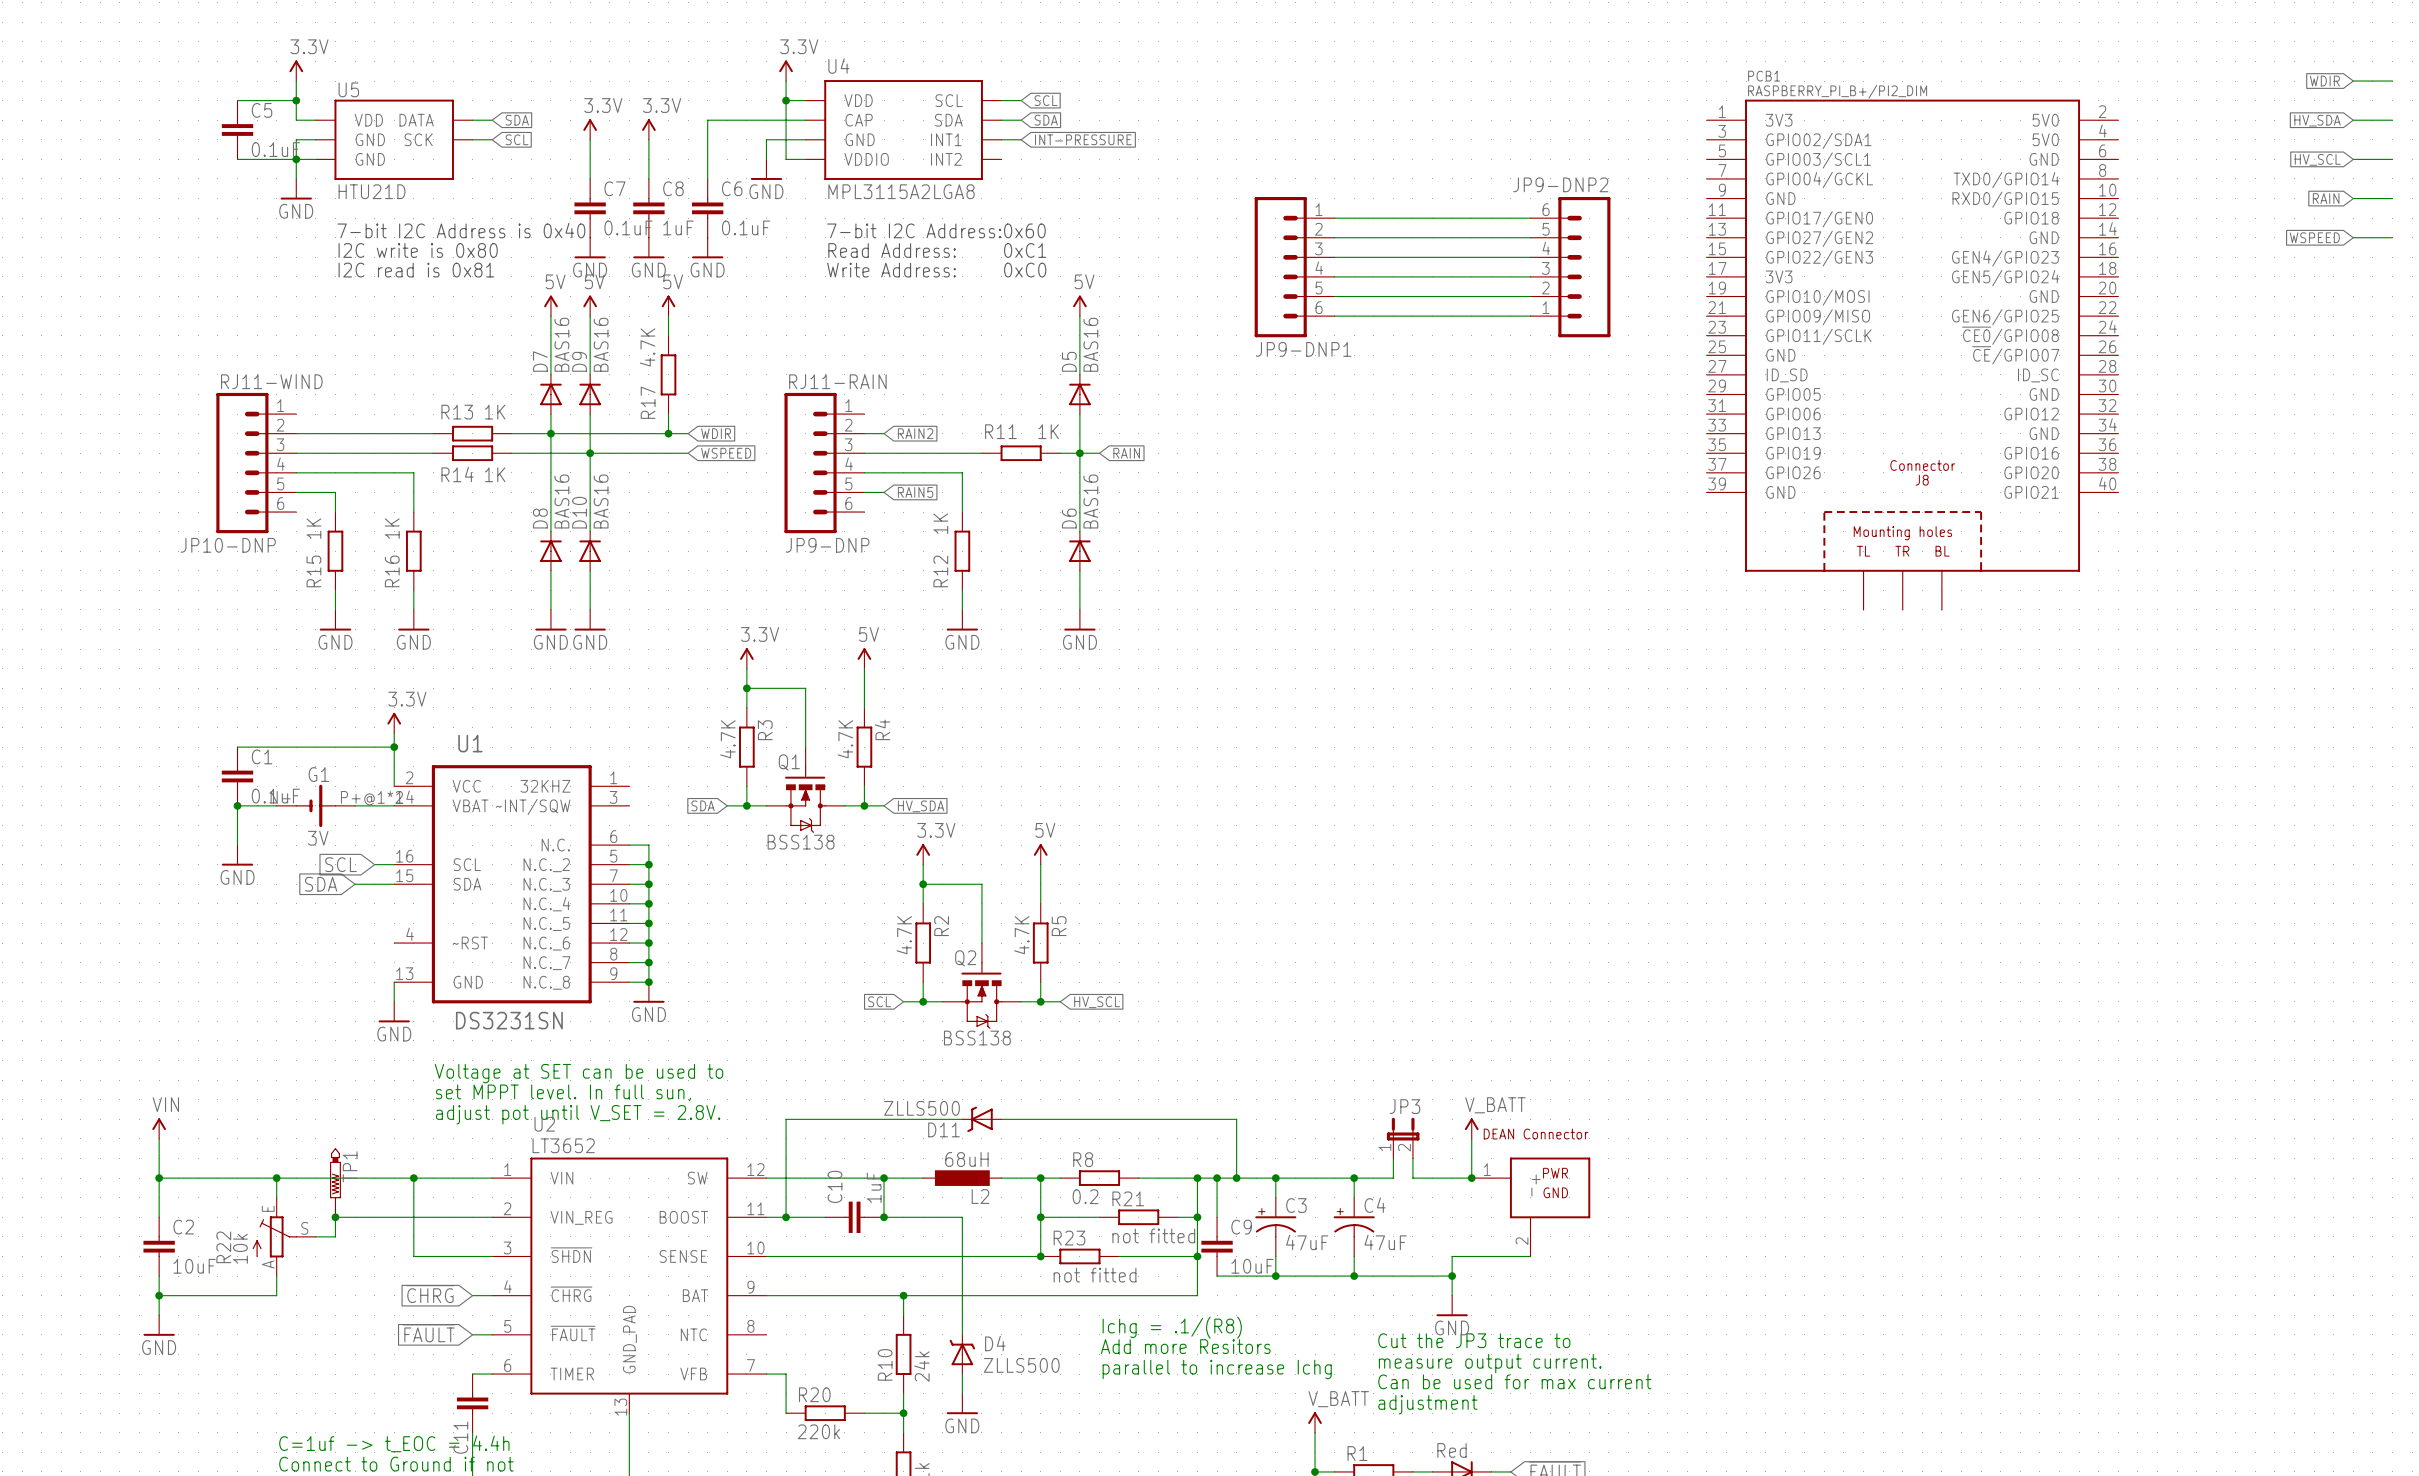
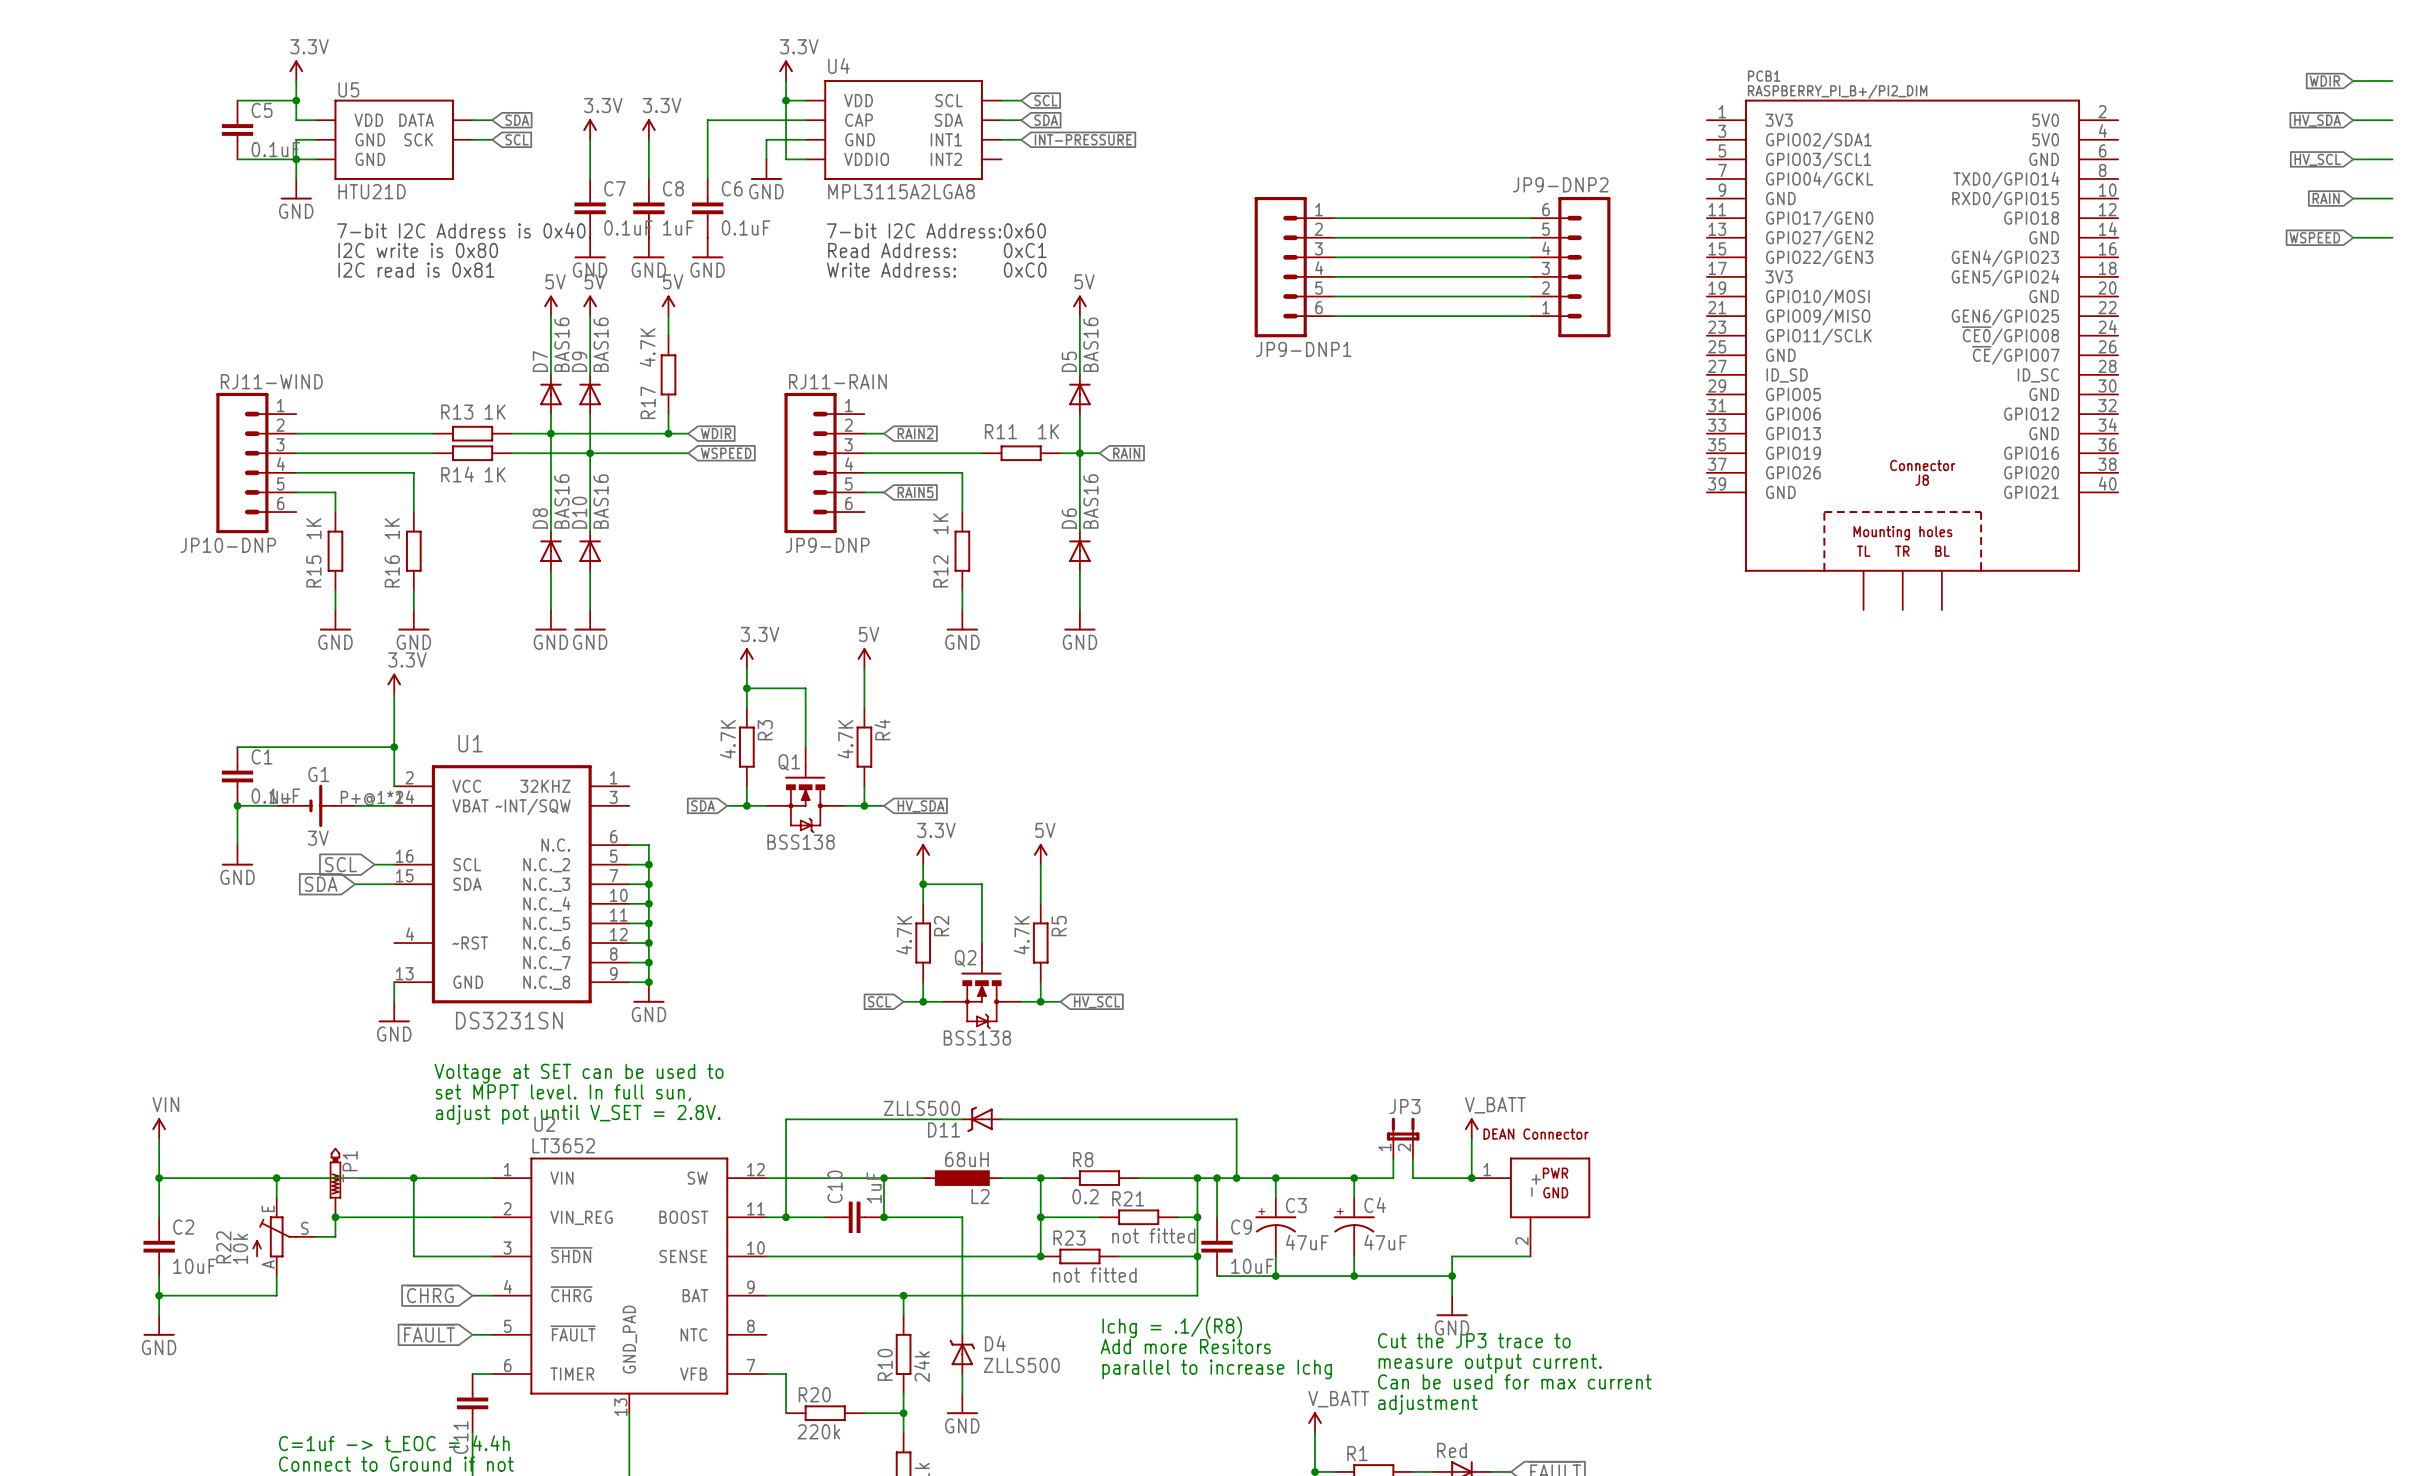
power symbol position: 3.3V (394, 723) -> 3.3V (394, 683)

